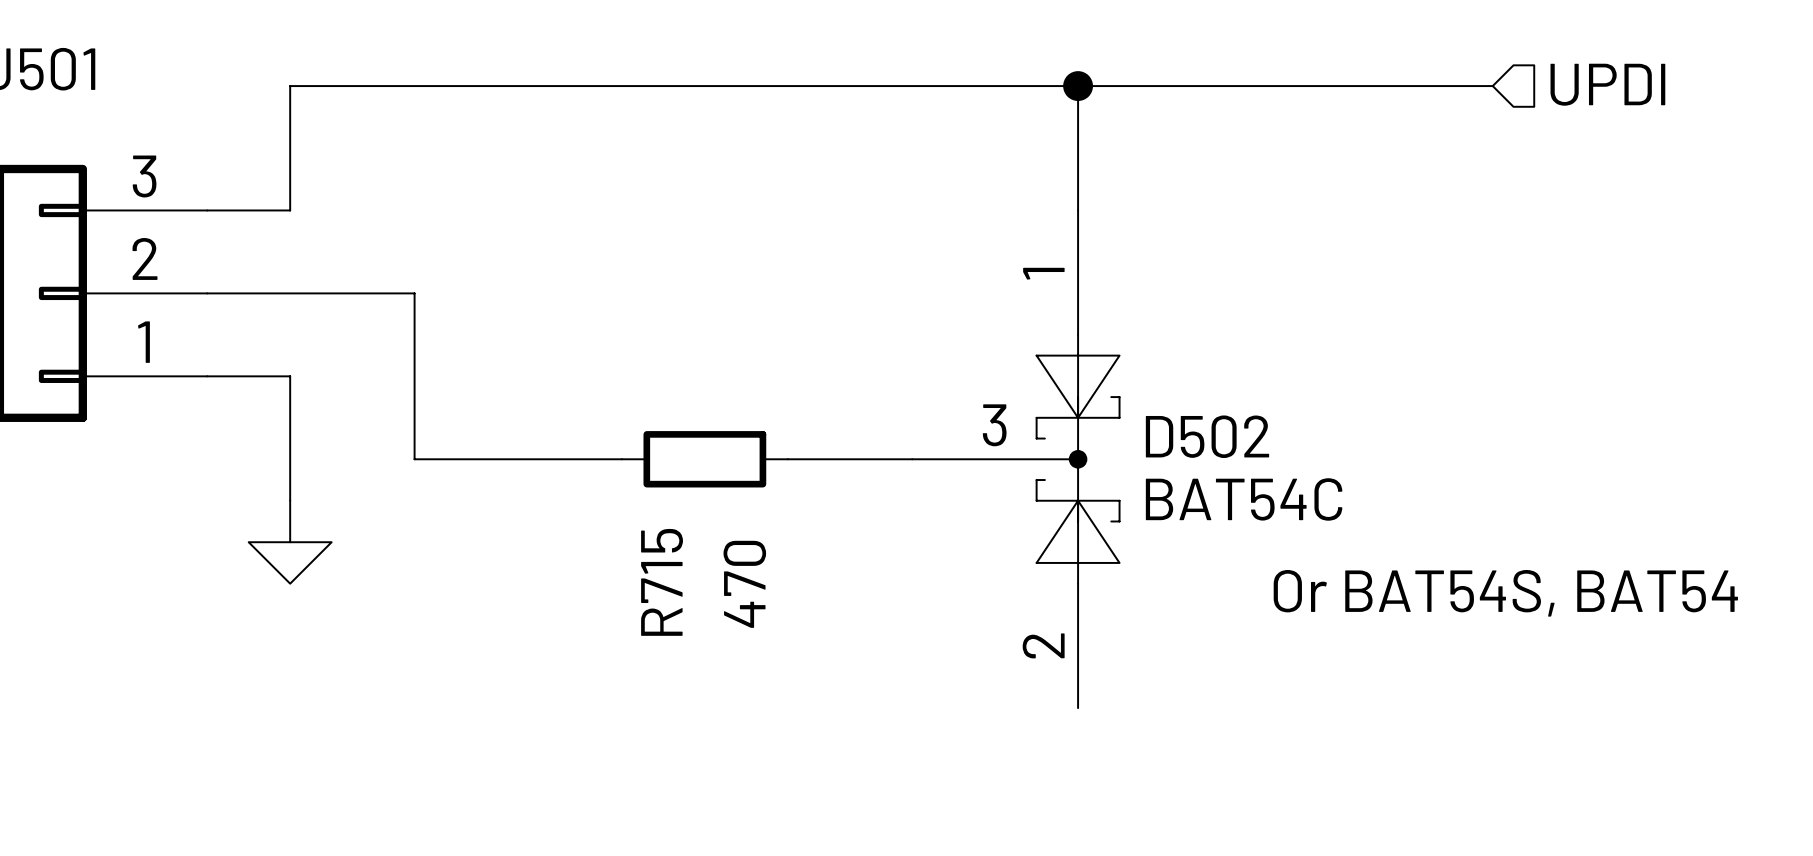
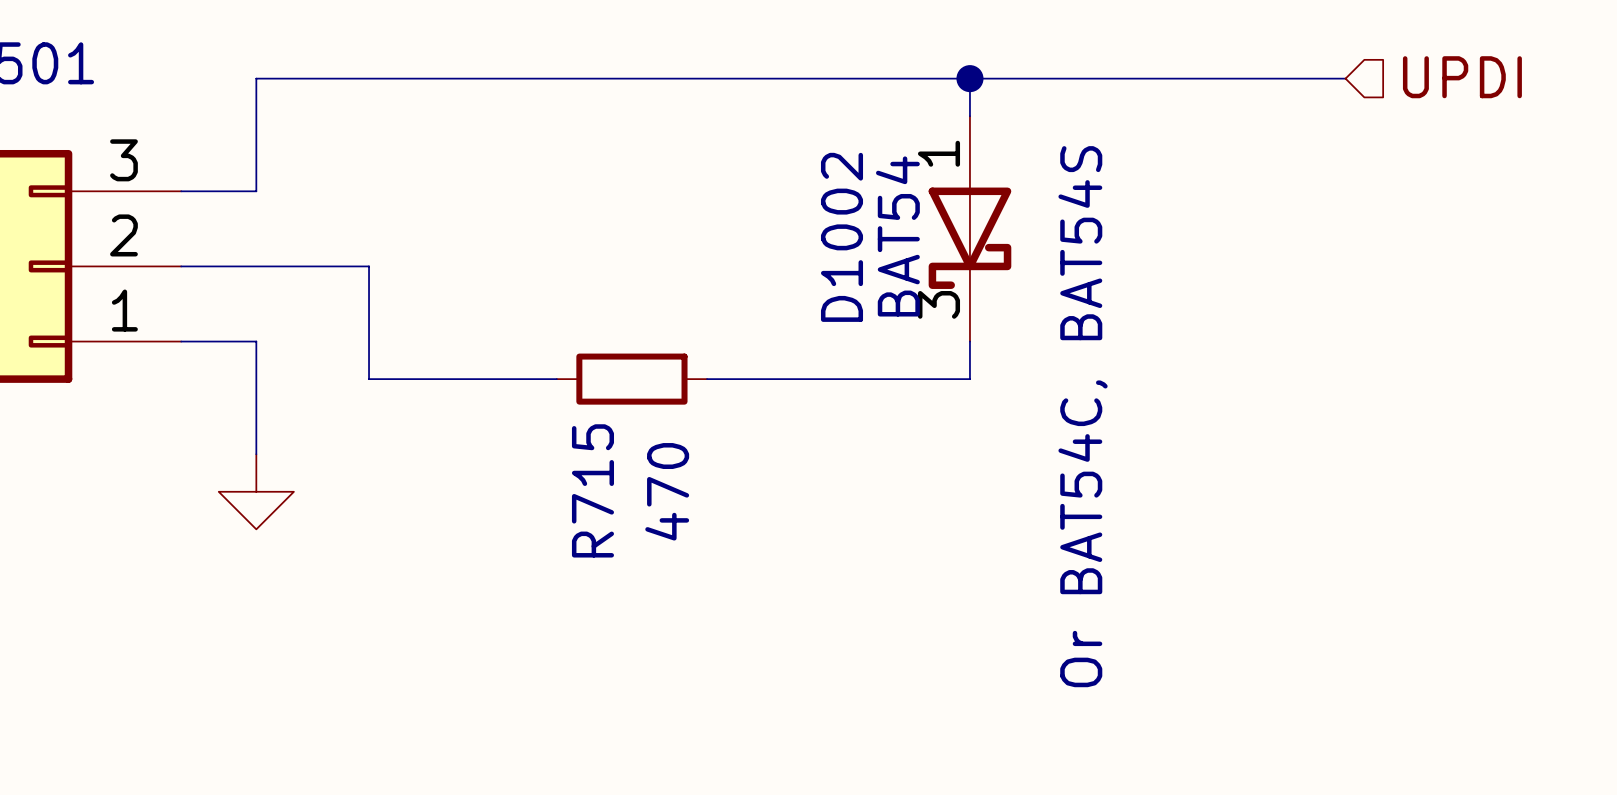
D1002: none -> BAT54 (969, 228)
wire: none -> (969, 341) (969, 379) (707, 379)
wire: (414, 417) (414, 459) (621, 459) -> (369, 379) (556, 379)
R715 position: (704, 459) -> (631, 379)
wire: (787, 459) (912, 459) -> none
D502: BAT54C (1015, 459) -> none
text: Or BAT54S, BAT54 (1505, 593) -> none

